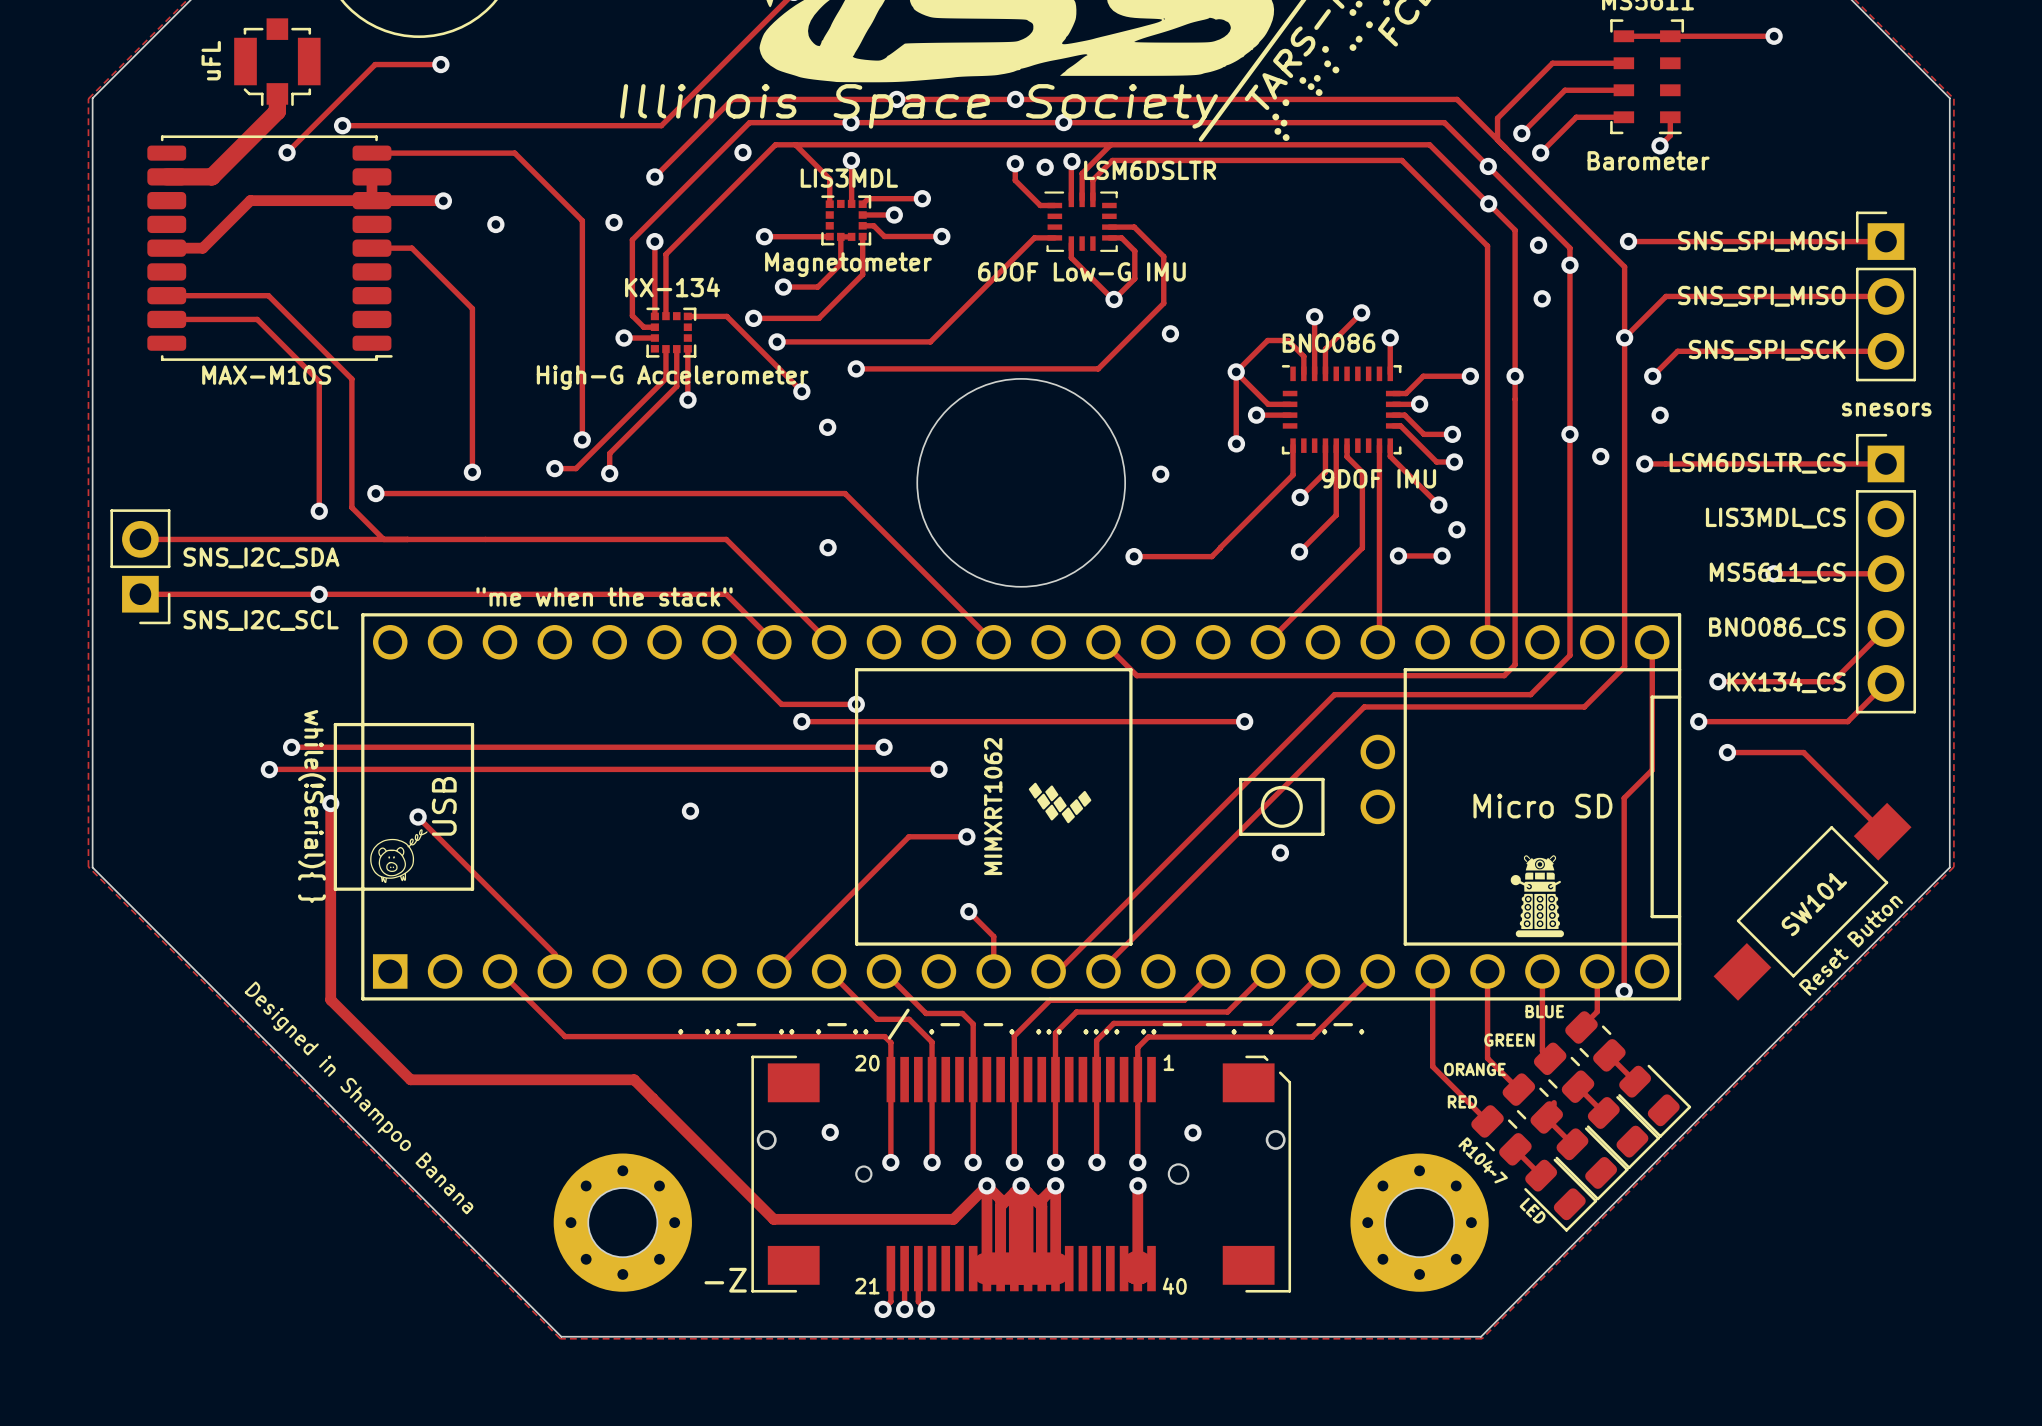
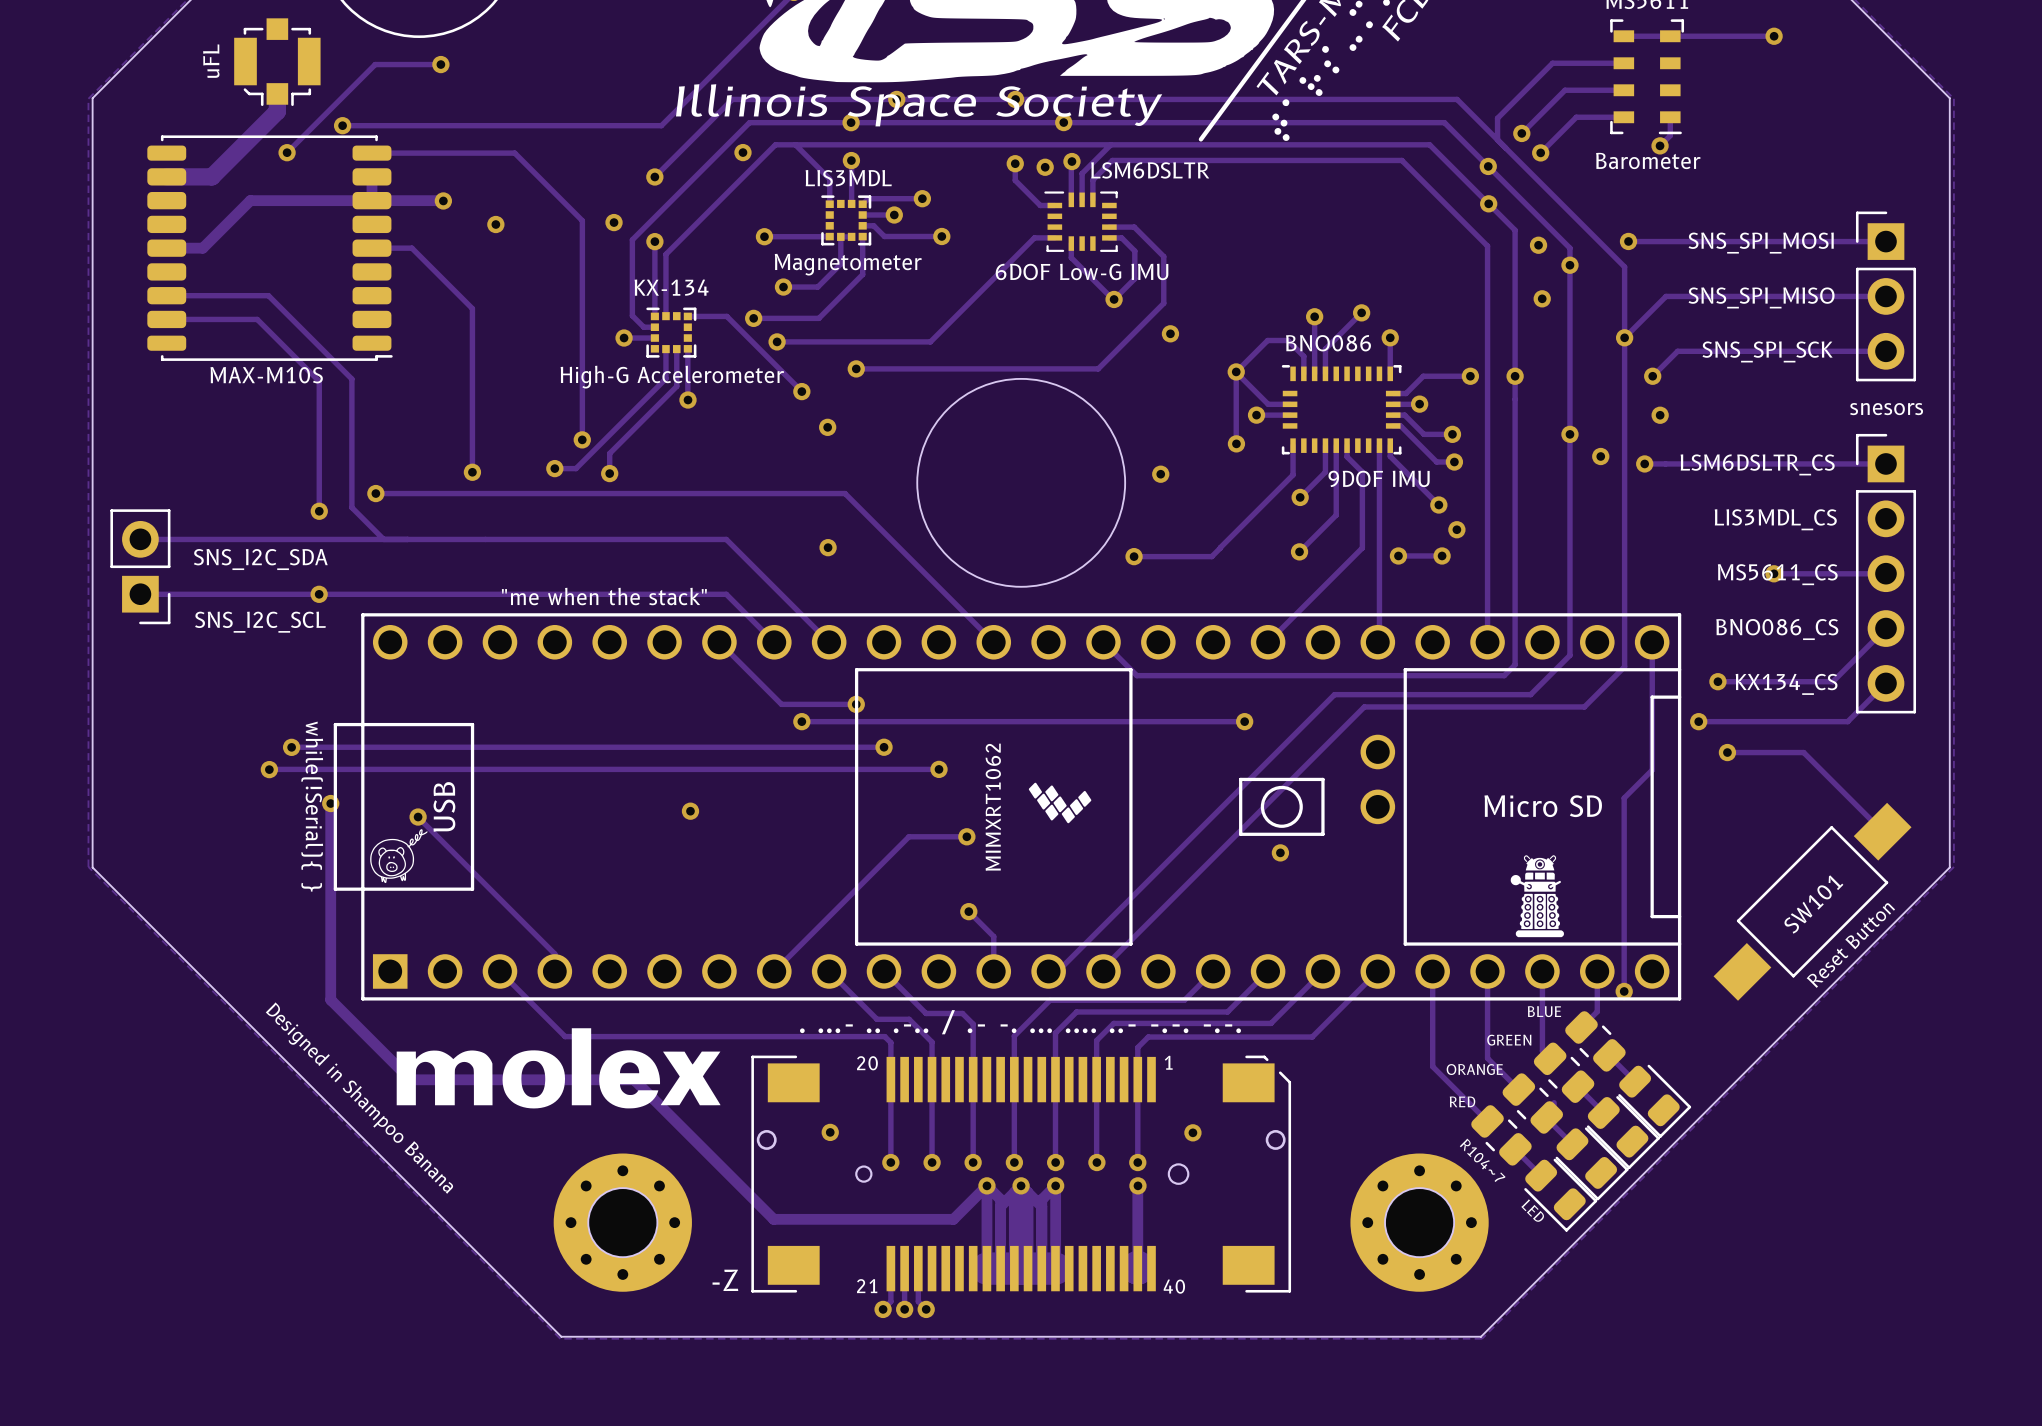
drawing: none -> [396, 1028, 721, 1109]

